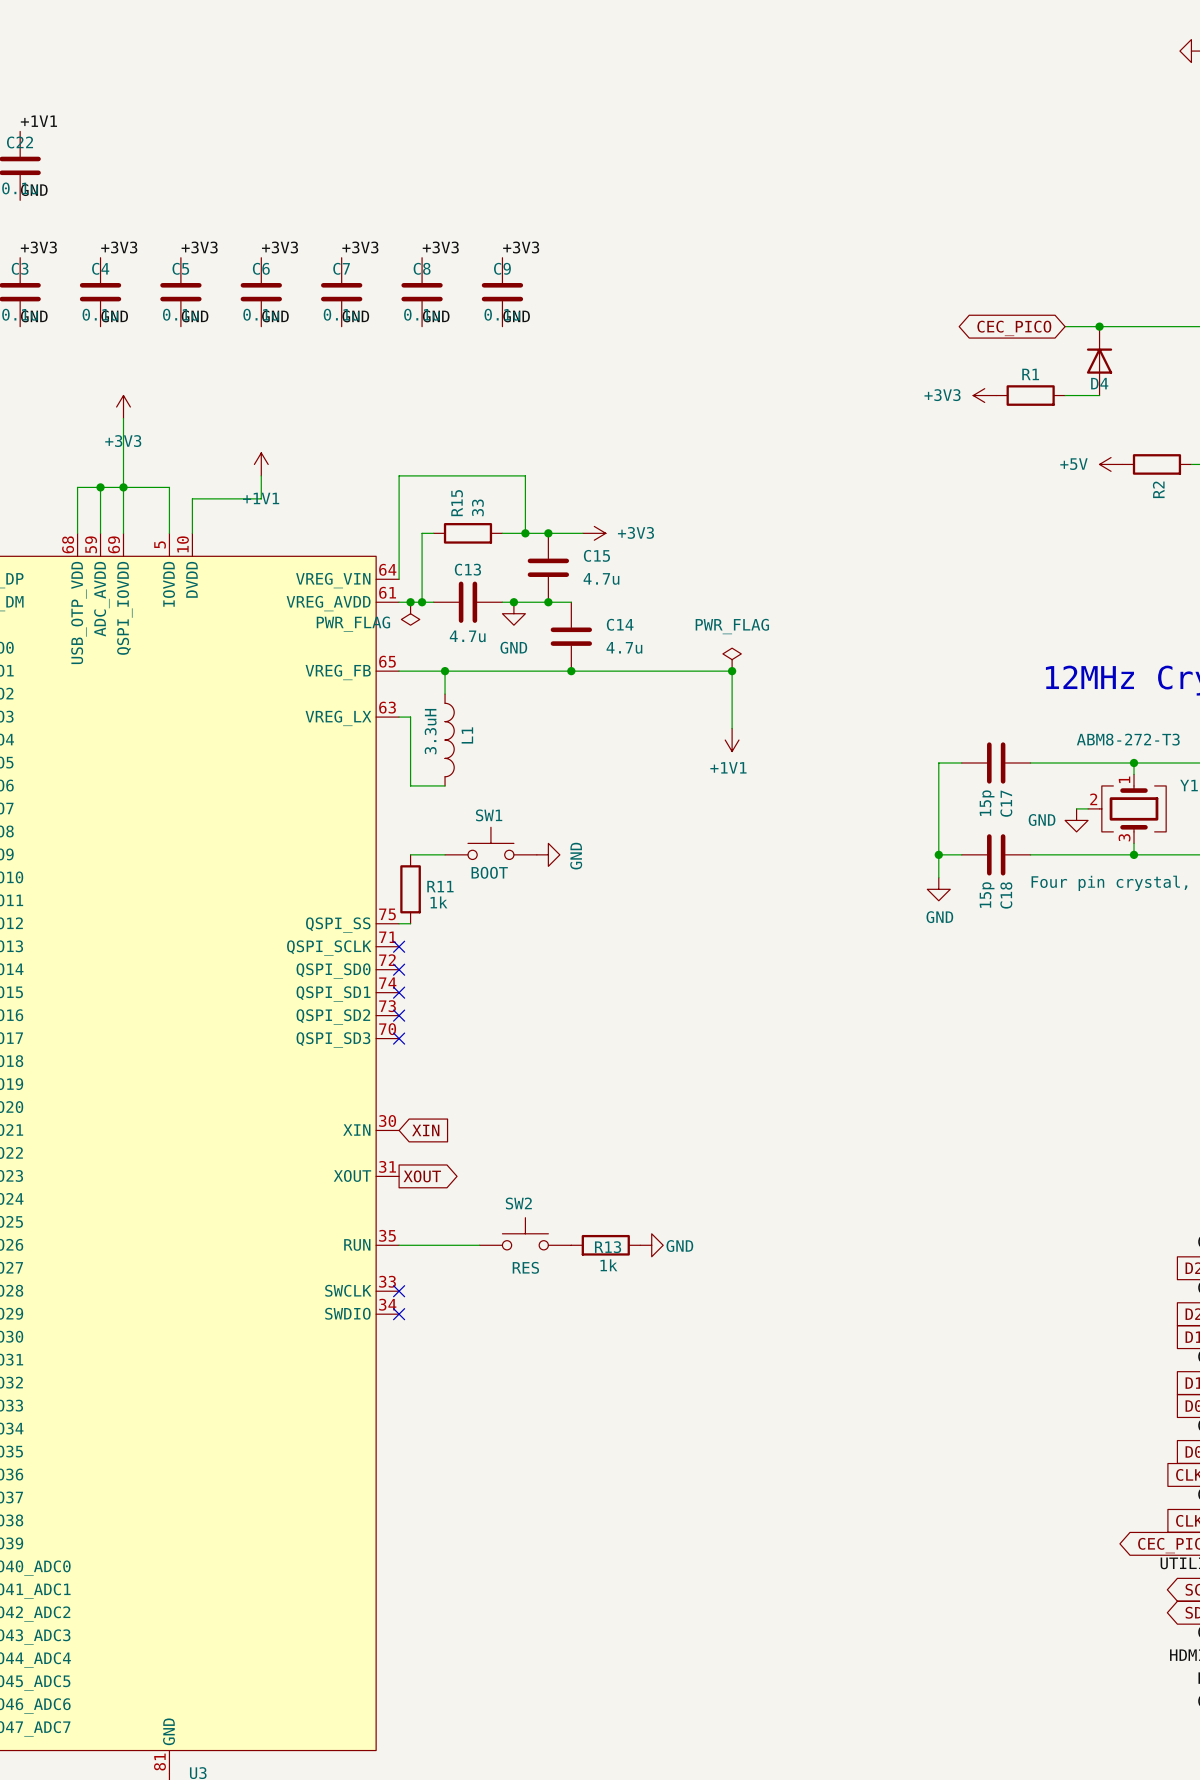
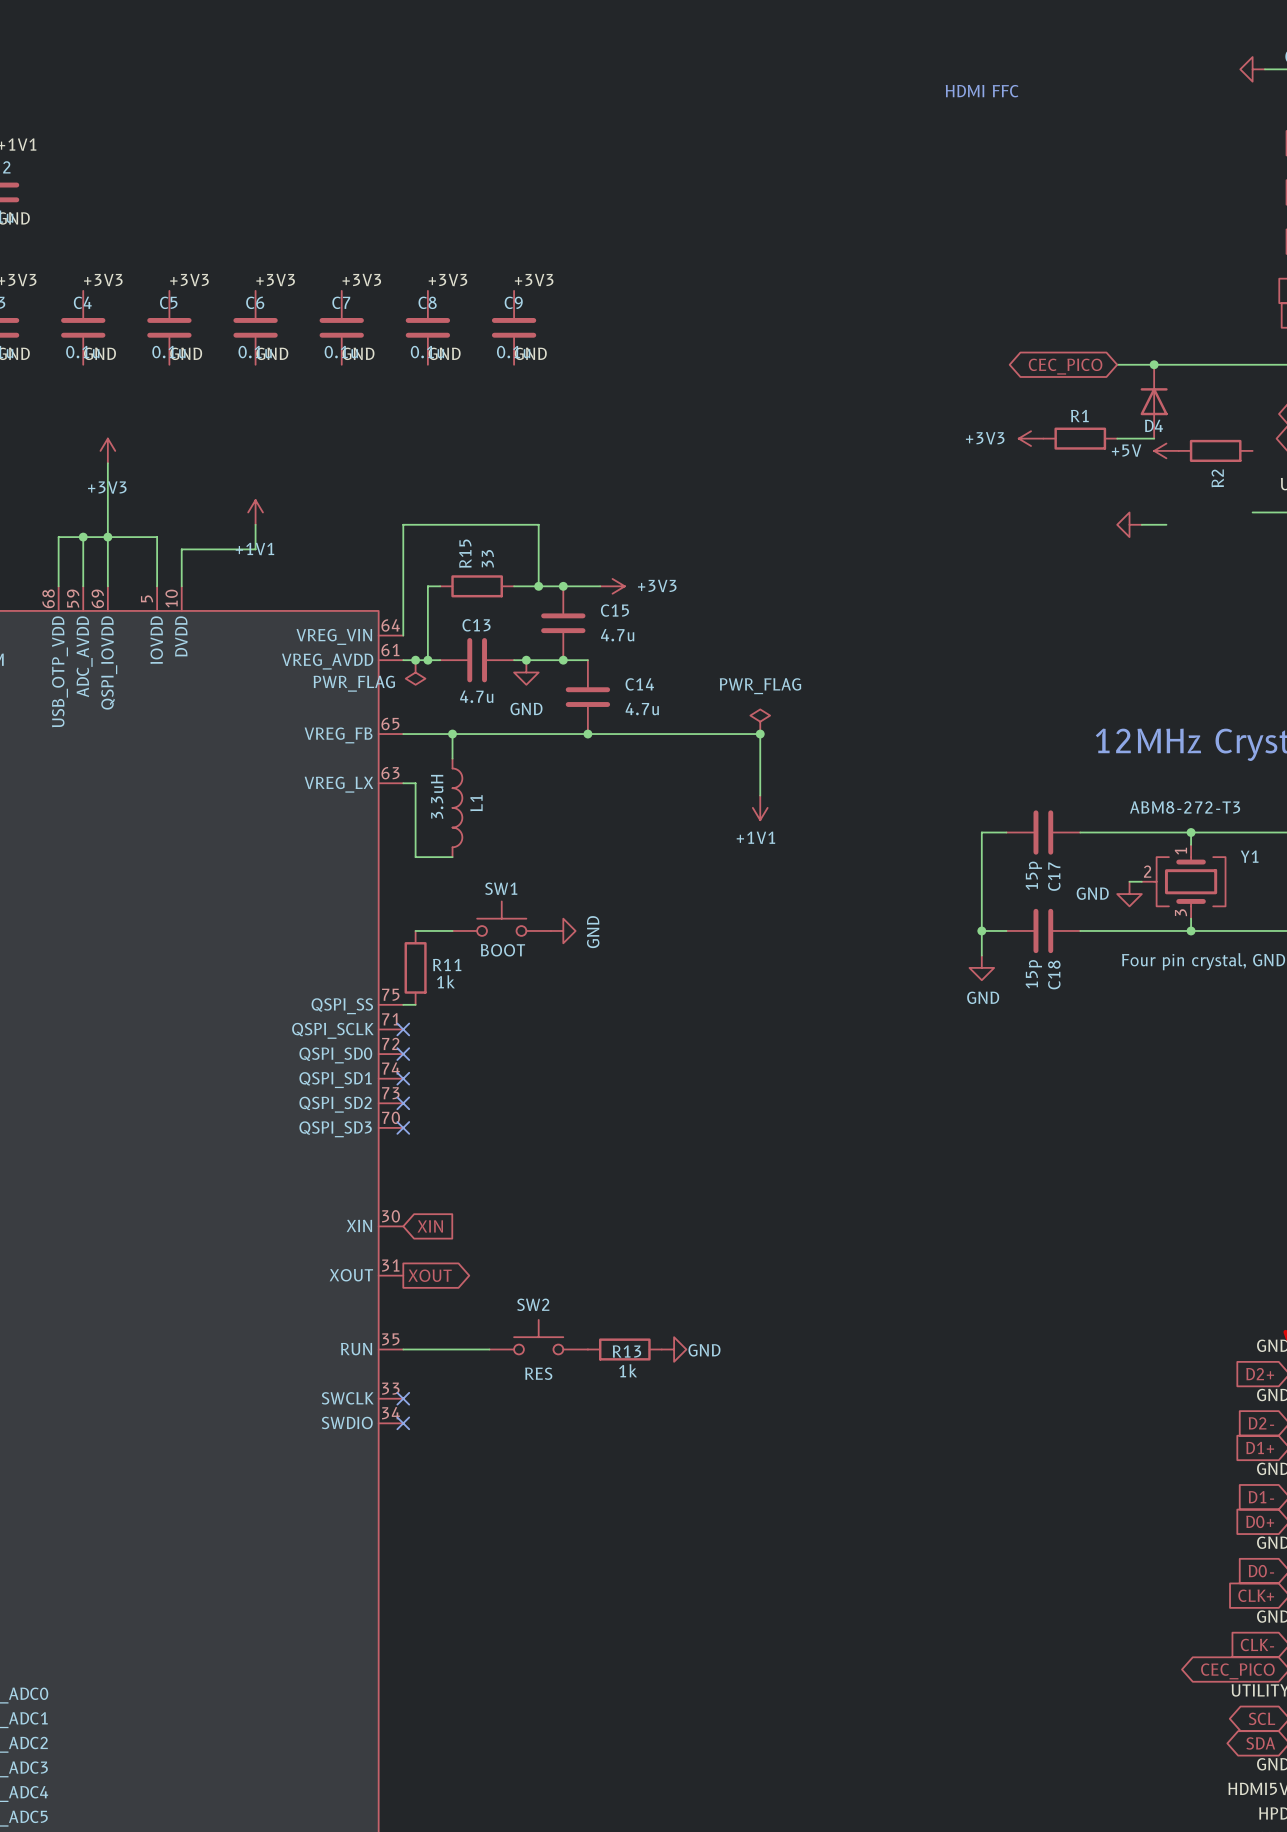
text: none -> HDMI FFC (982, 91)
power symbol position: +5V (1111, 464) -> +5V (1166, 450)
R2 position: (1156, 464) -> (1215, 450)
power symbol: none -> (1129, 524)
wire: none -> (1141, 524) (1166, 524)

